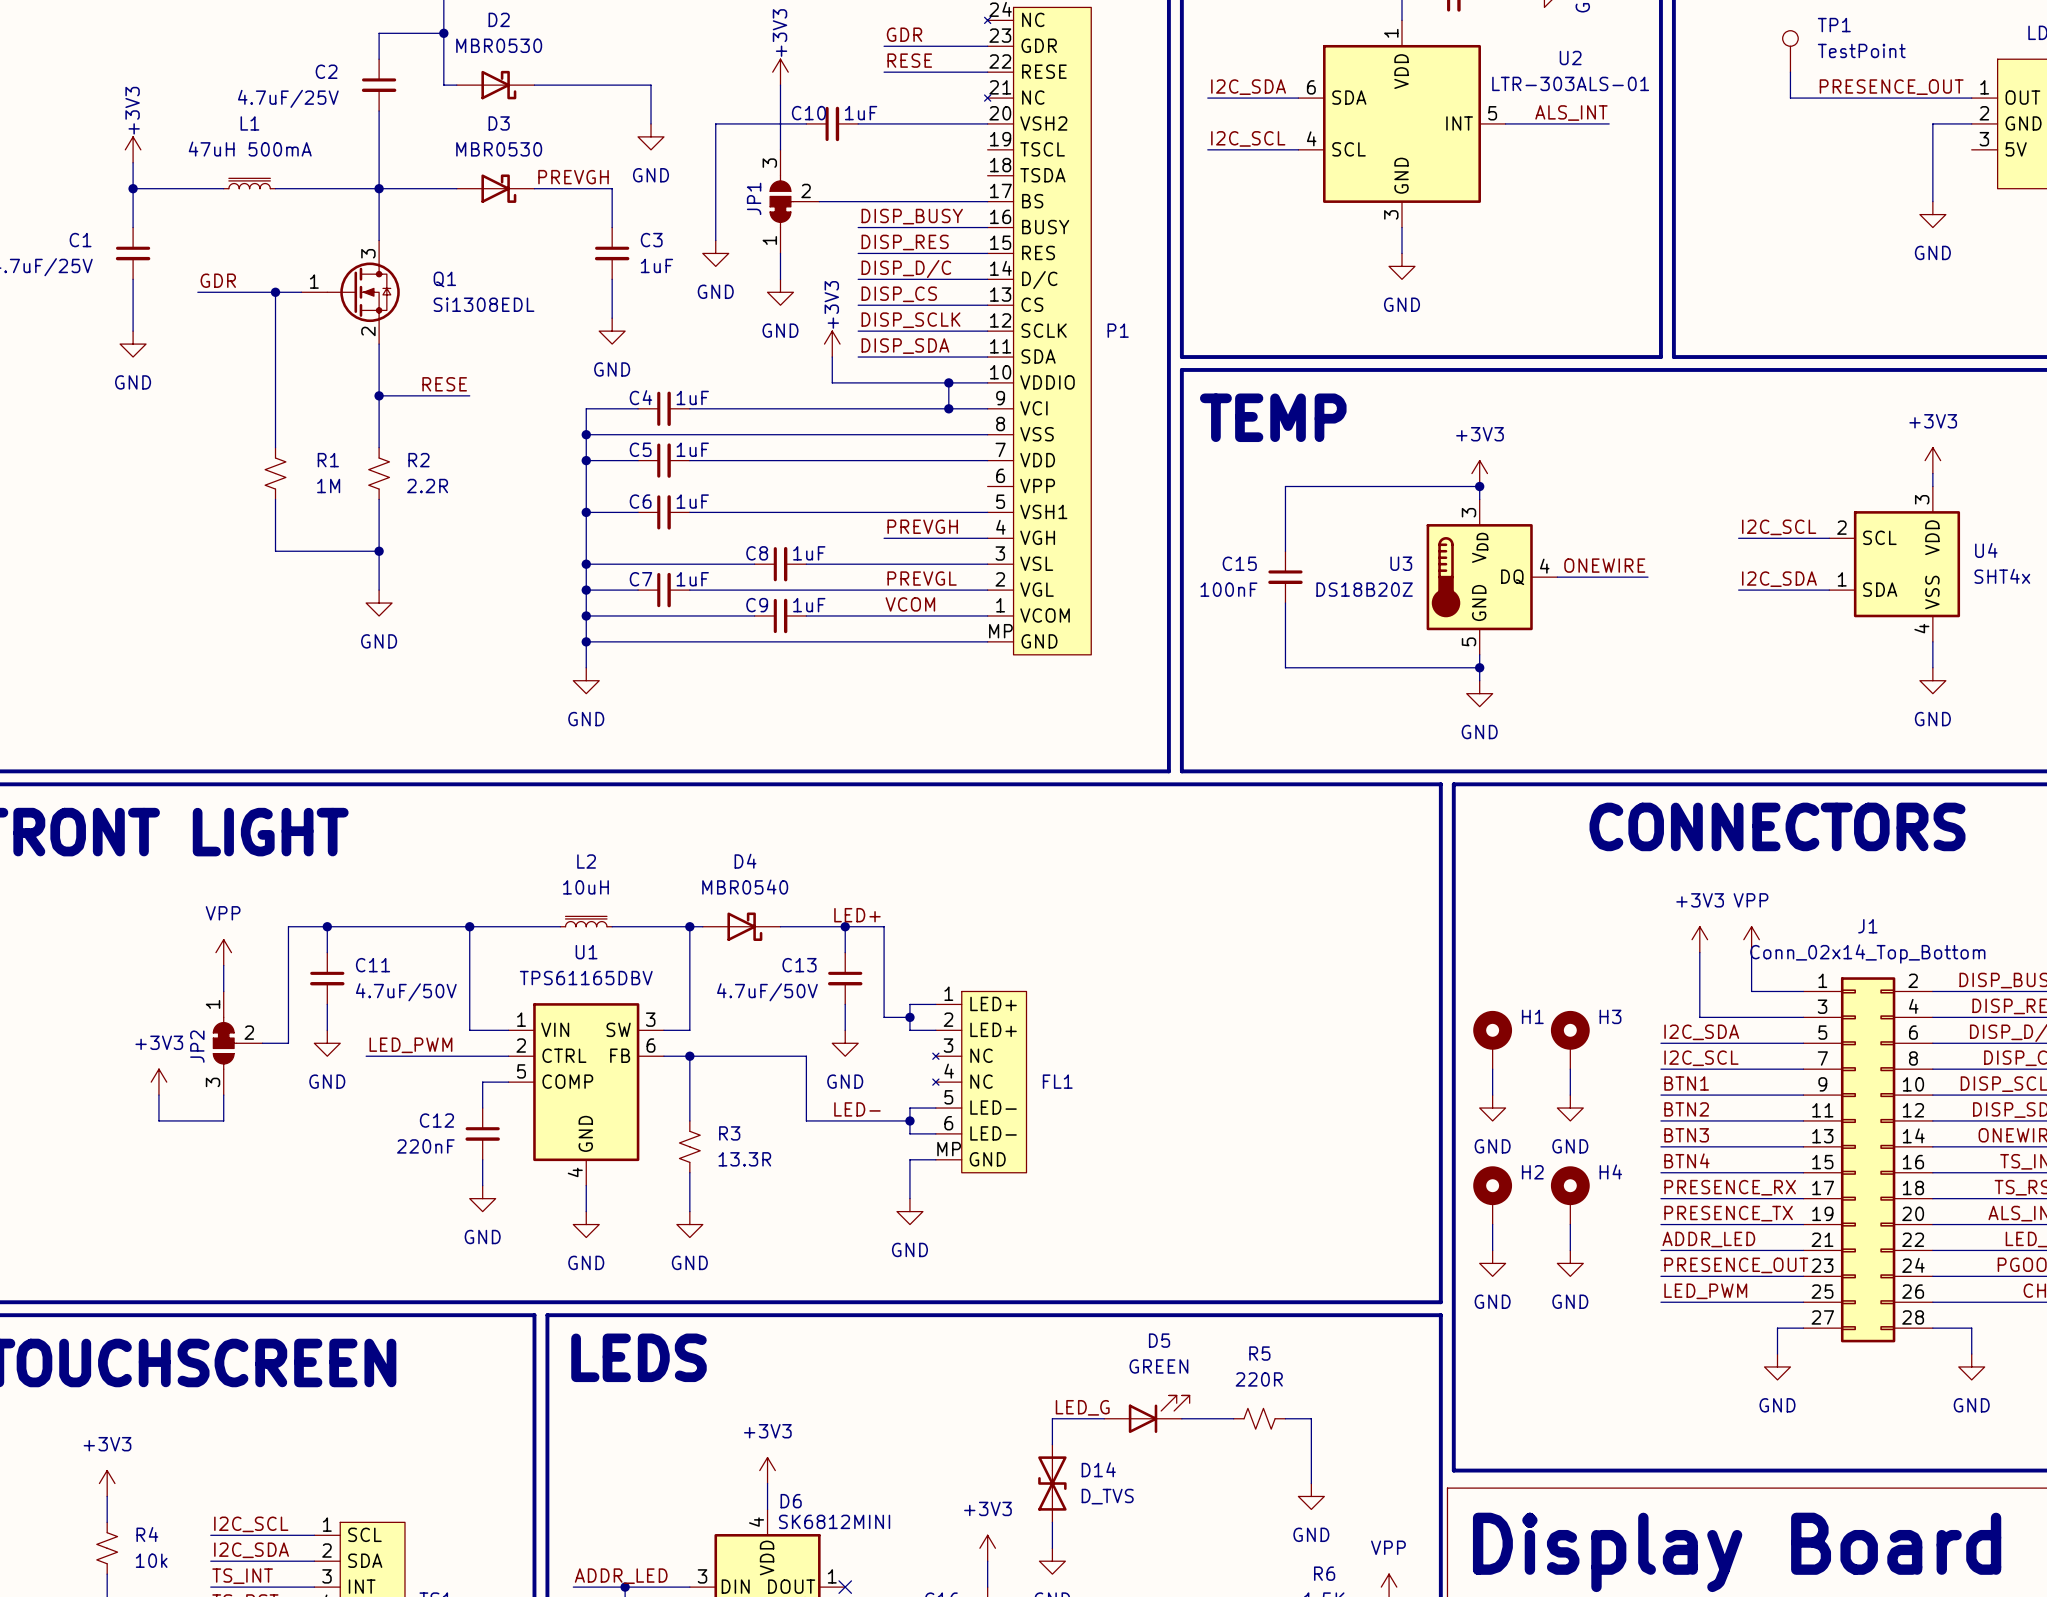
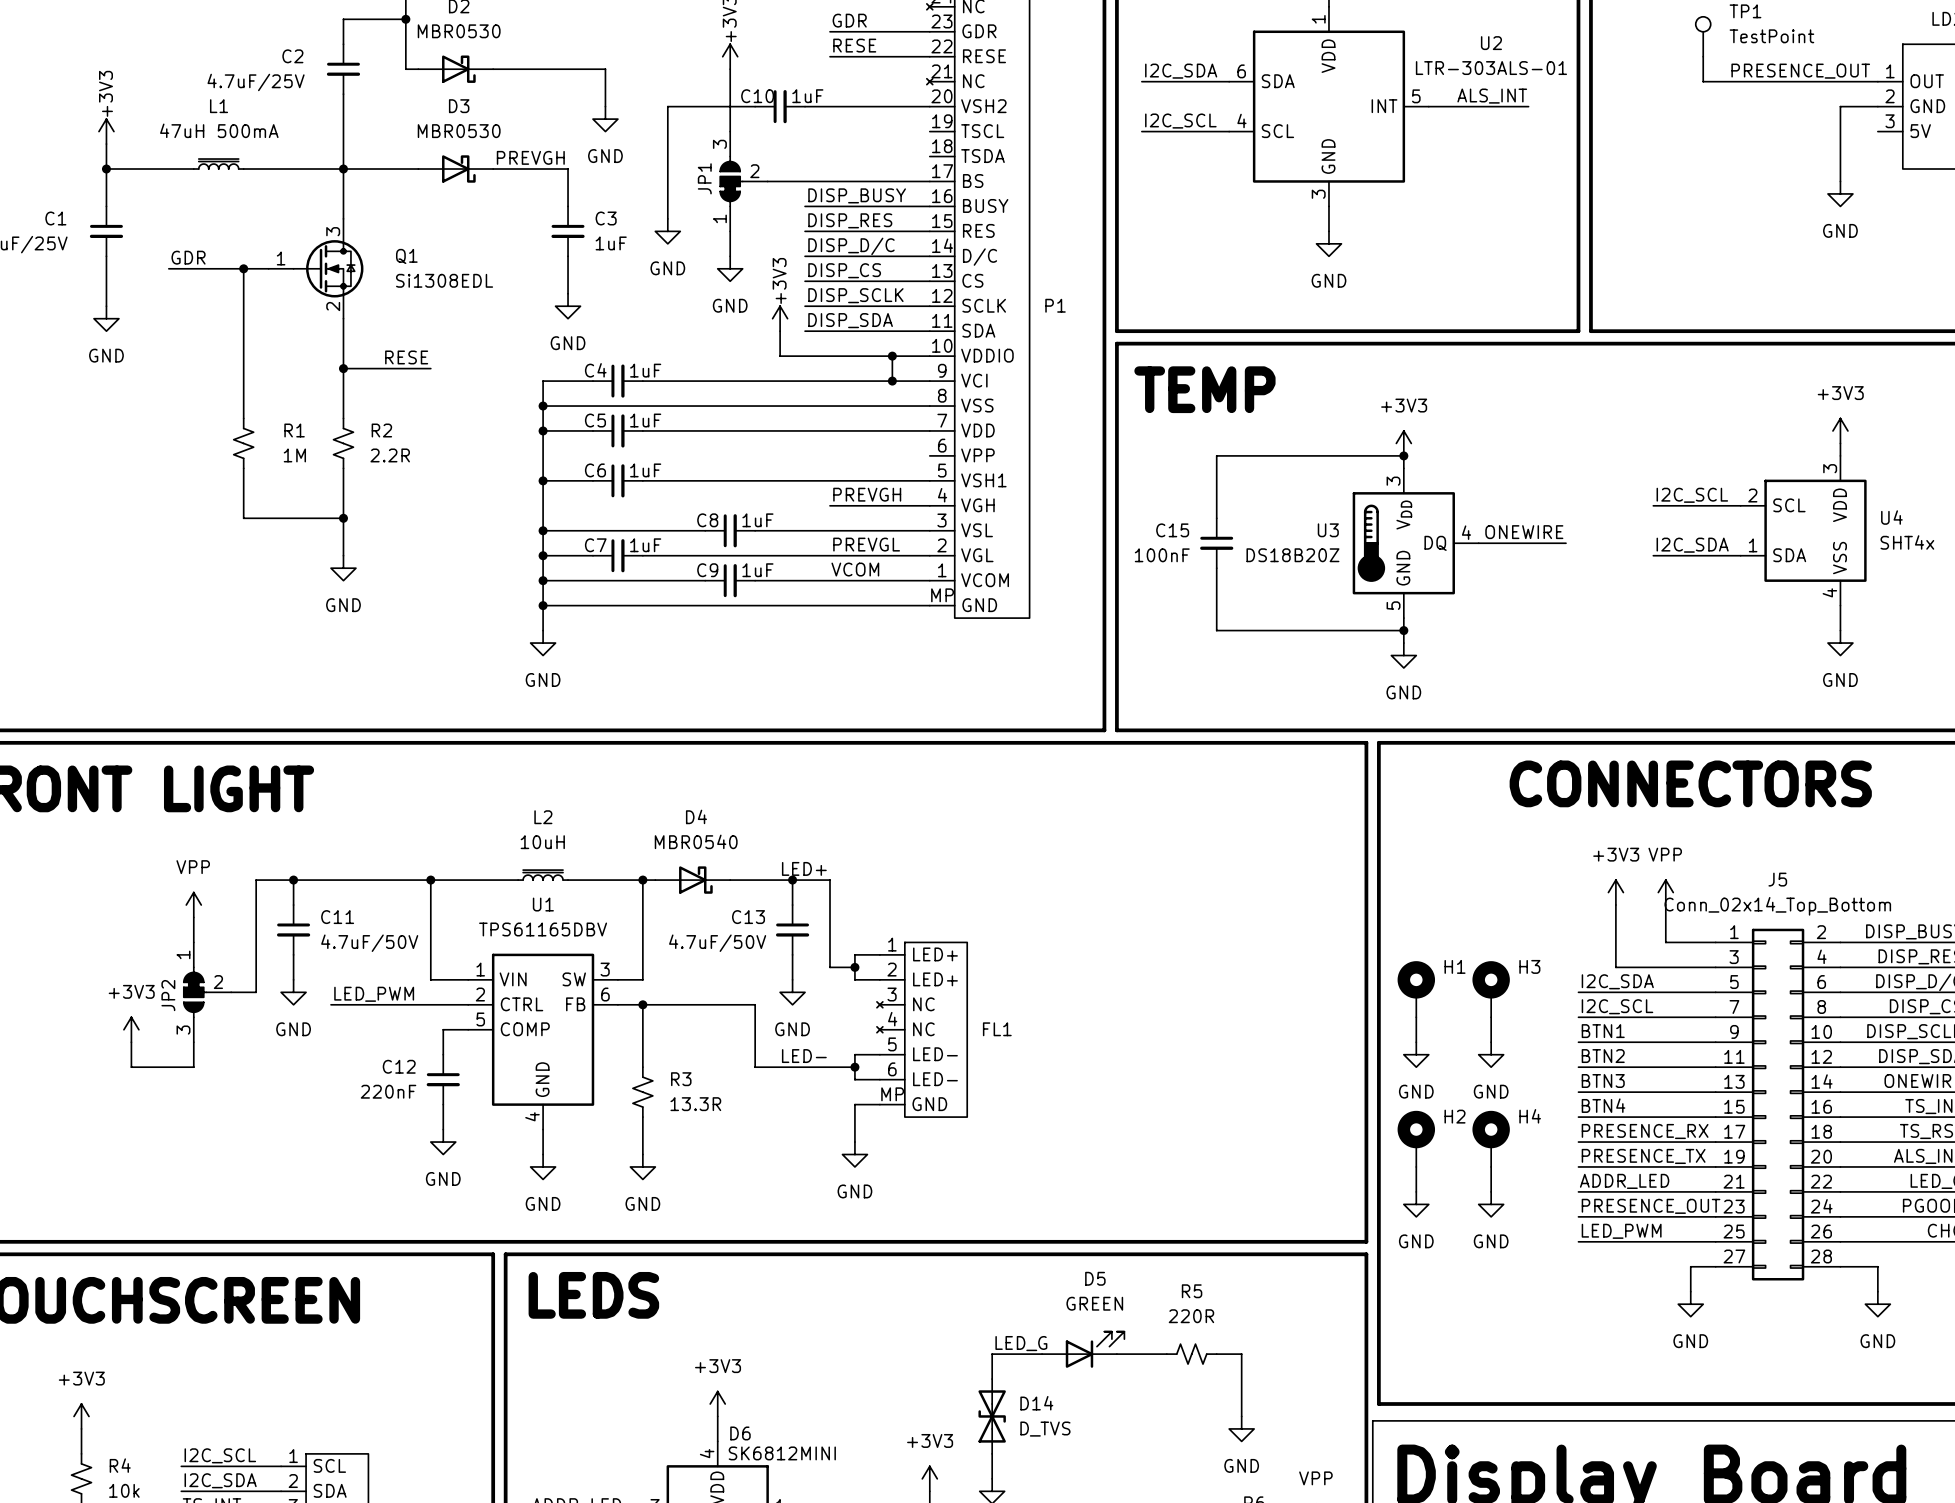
J1 name: J1 (1867, 926) -> J5 (1777, 879)

